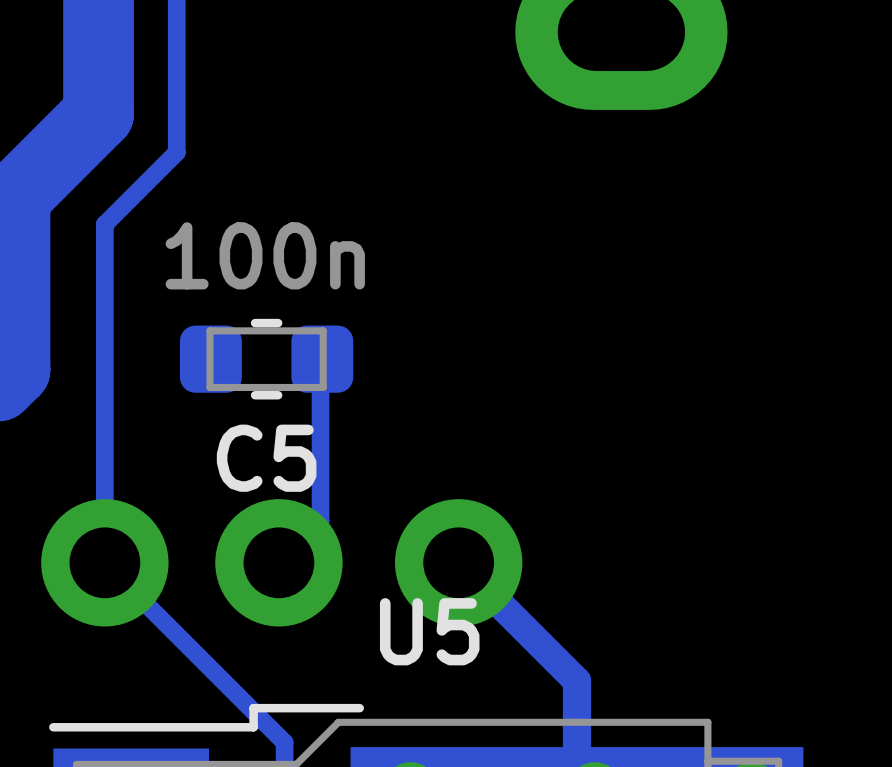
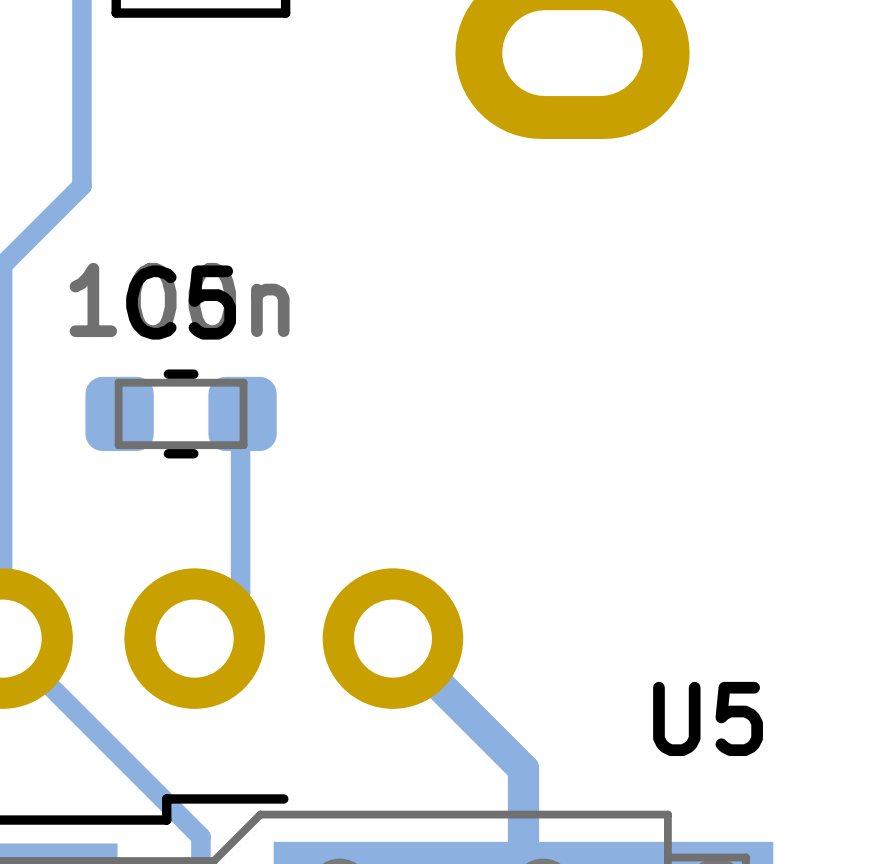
C5 name position: C5 (266, 458) -> C5 (181, 302)
U5 name position: U5 (429, 631) -> U5 (708, 718)

